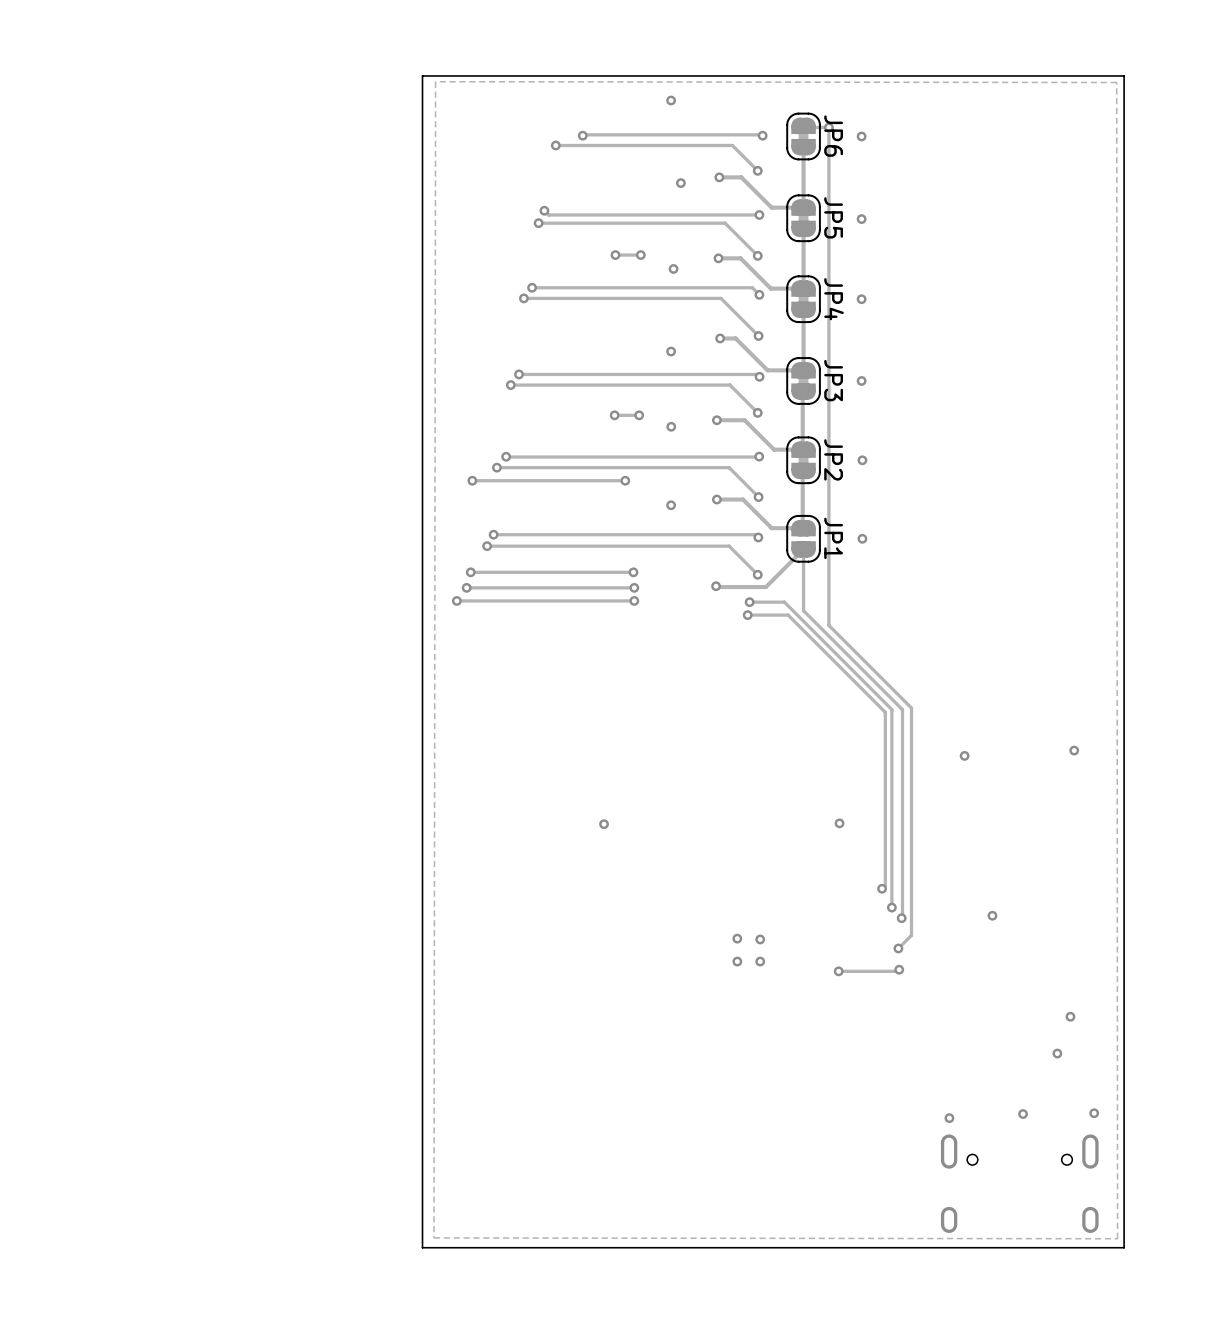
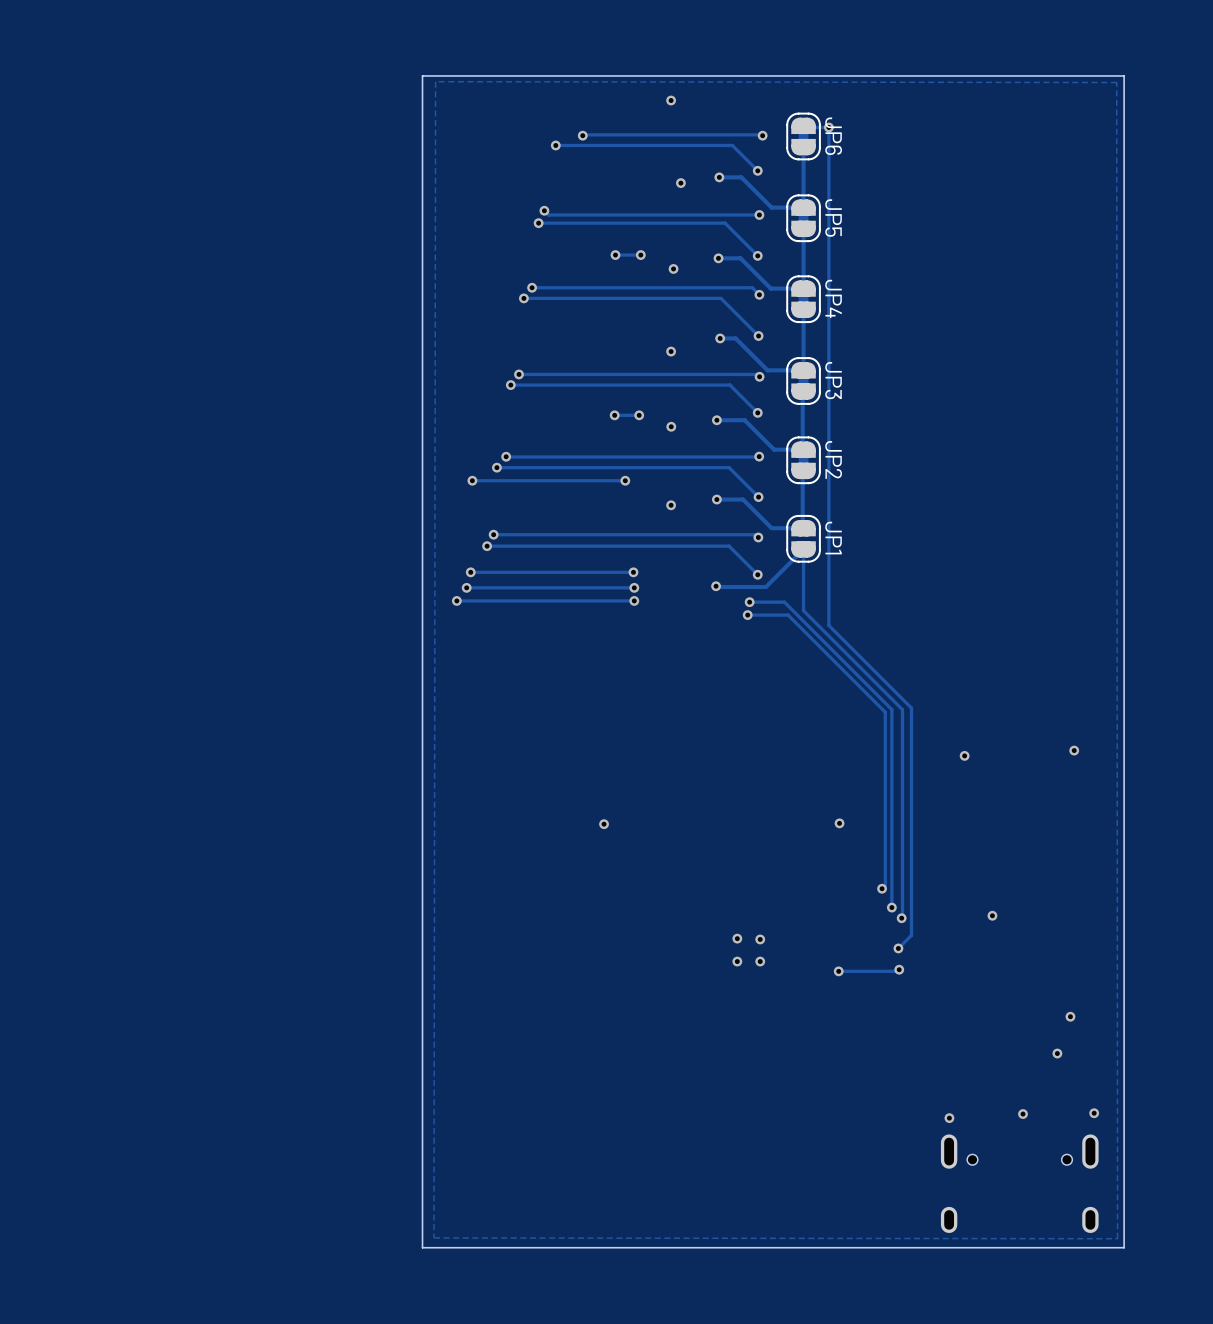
via: (861, 136) -> none
via: (861, 219) -> none
via: (861, 299) -> none
via: (861, 380) -> none
via: (862, 460) -> none
via: (862, 538) -> none

